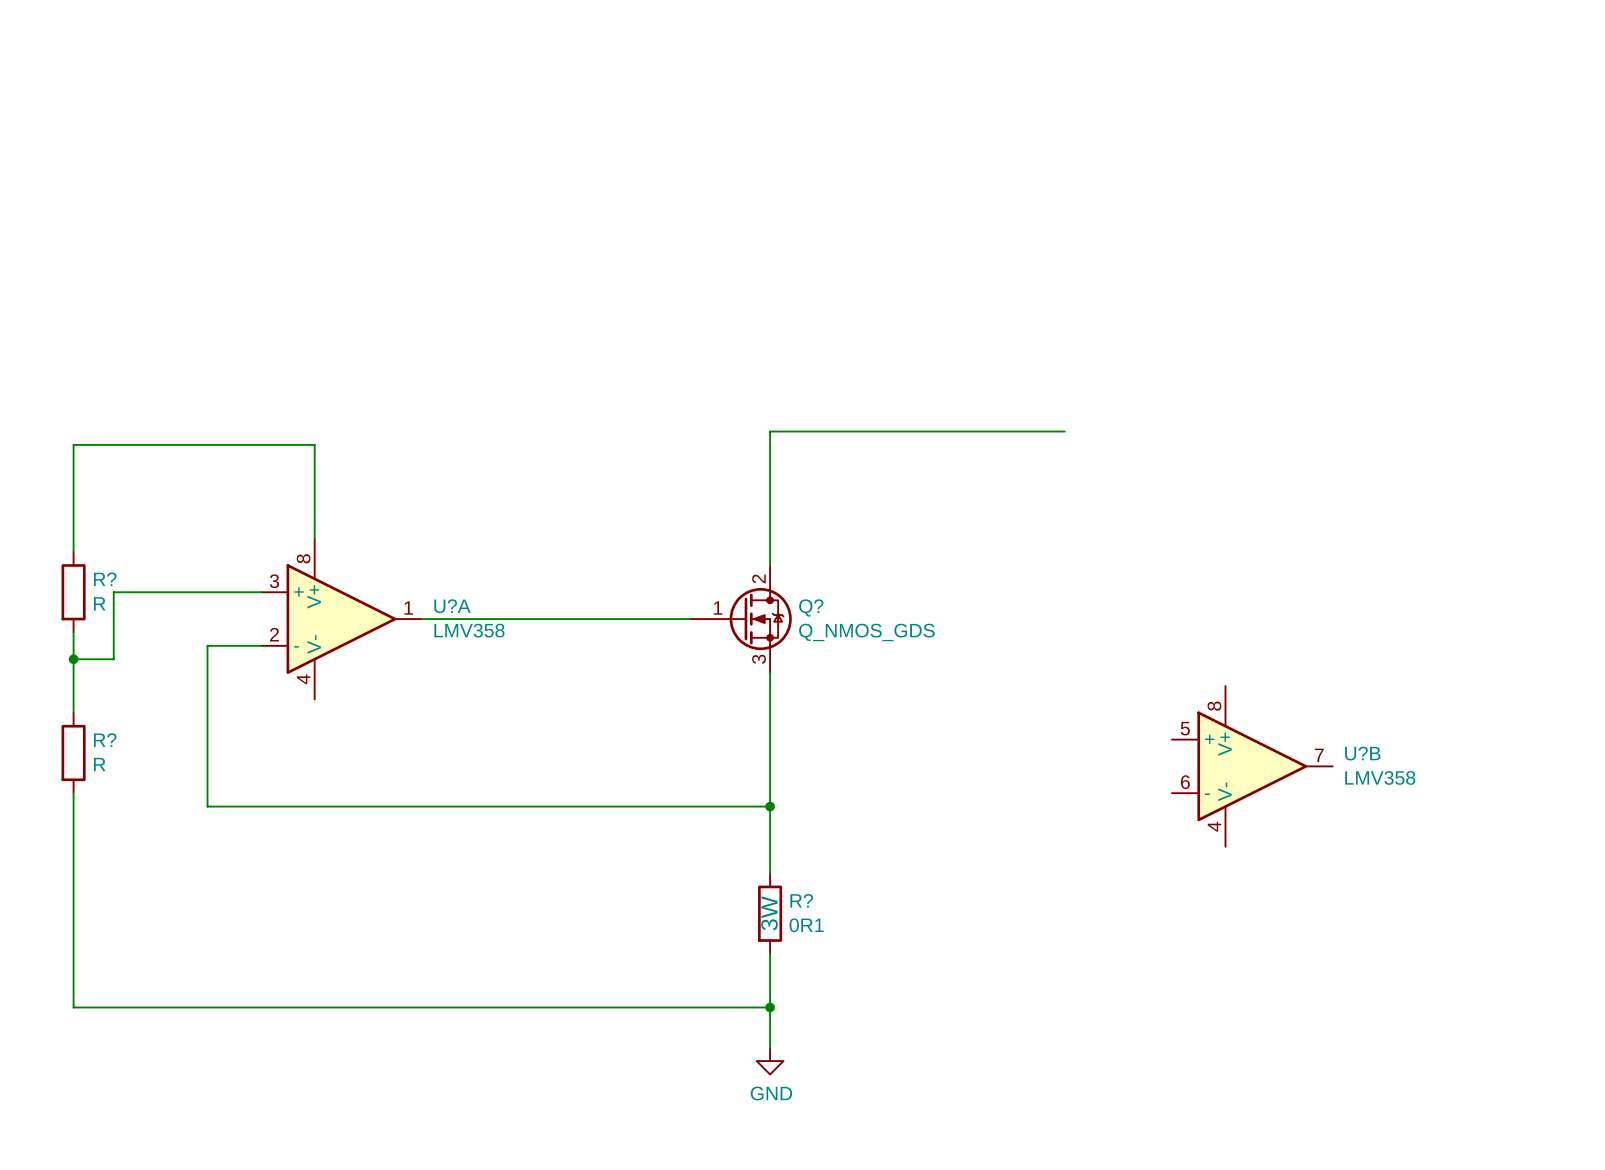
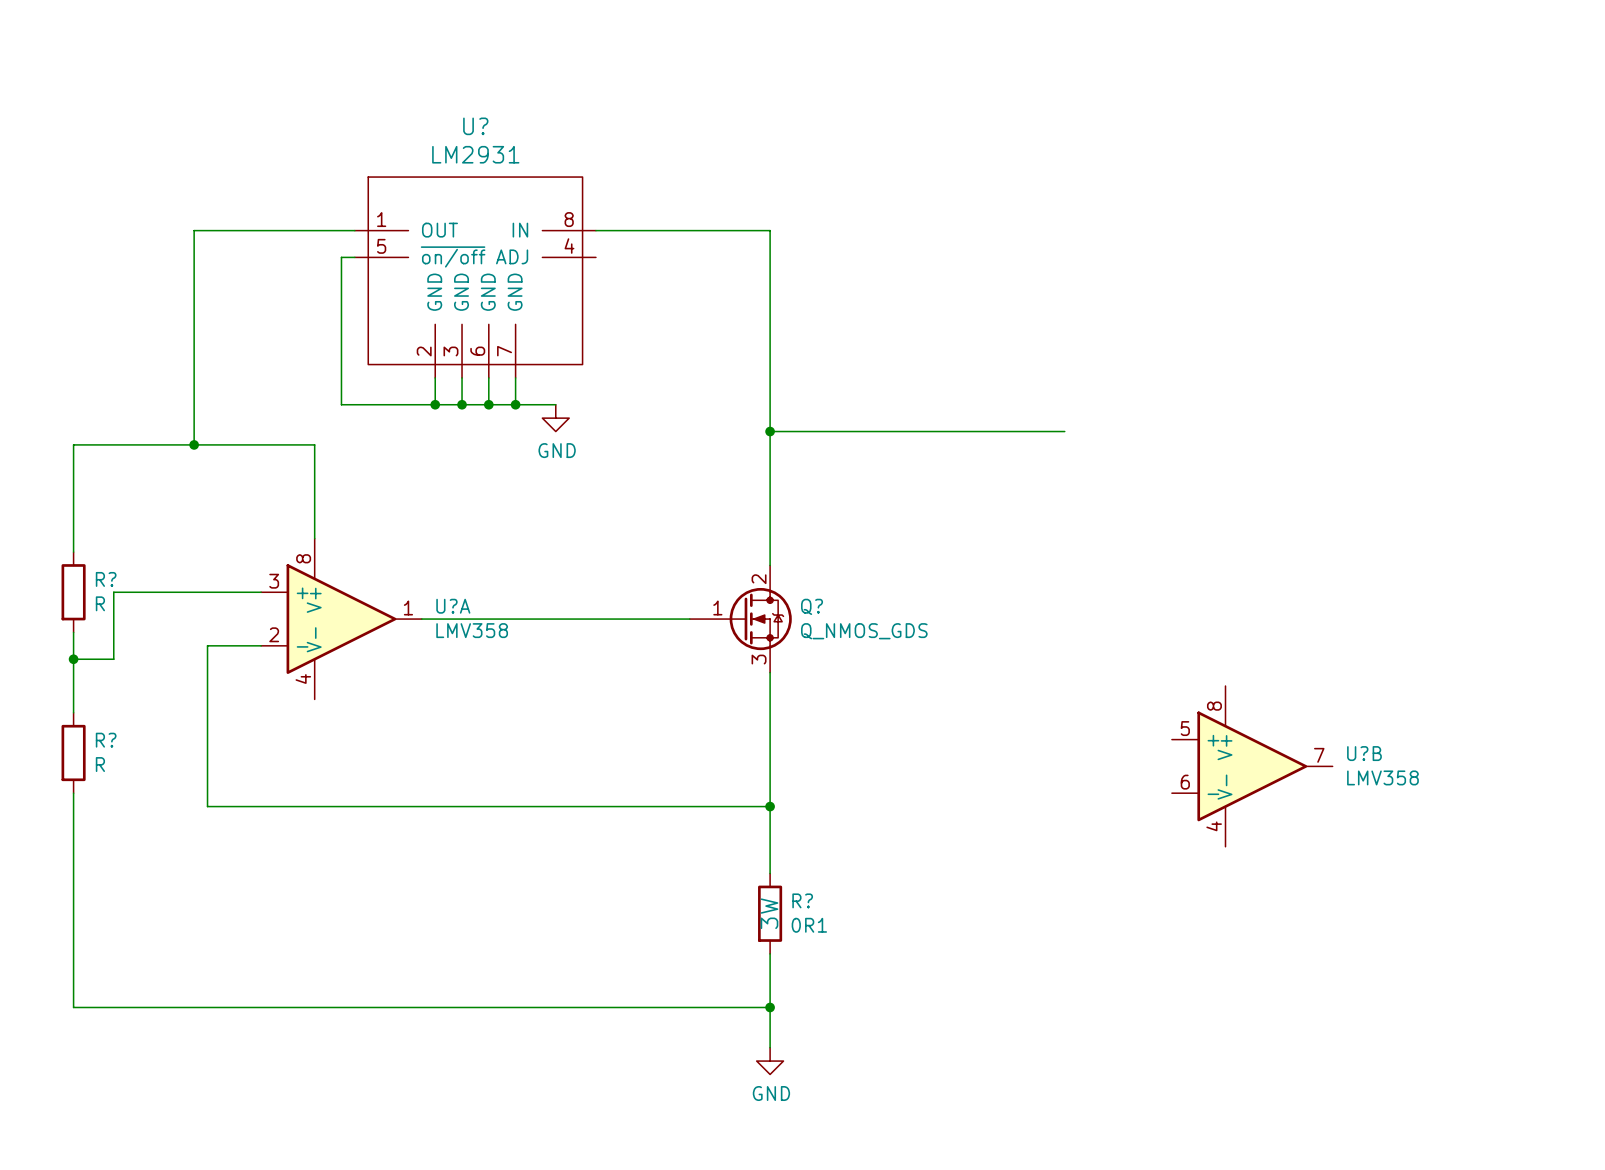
wire: none -> (354, 230) (194, 230) (194, 444)
wire: none -> (595, 230) (770, 230) (770, 431)
wire: none -> (354, 257) (341, 257) (341, 404) (555, 404)
U?: none -> LM2931 (475, 277)
wire: none -> (435, 377) (435, 404)
wire: none -> (462, 377) (462, 404)
wire: none -> (488, 377) (488, 404)
wire: none -> (515, 377) (515, 404)
junction: none -> (435, 404)
junction: none -> (462, 404)
junction: none -> (488, 404)
junction: none -> (515, 404)
power symbol: none -> GND (555, 418)
junction: none -> (770, 431)
junction: none -> (194, 444)

